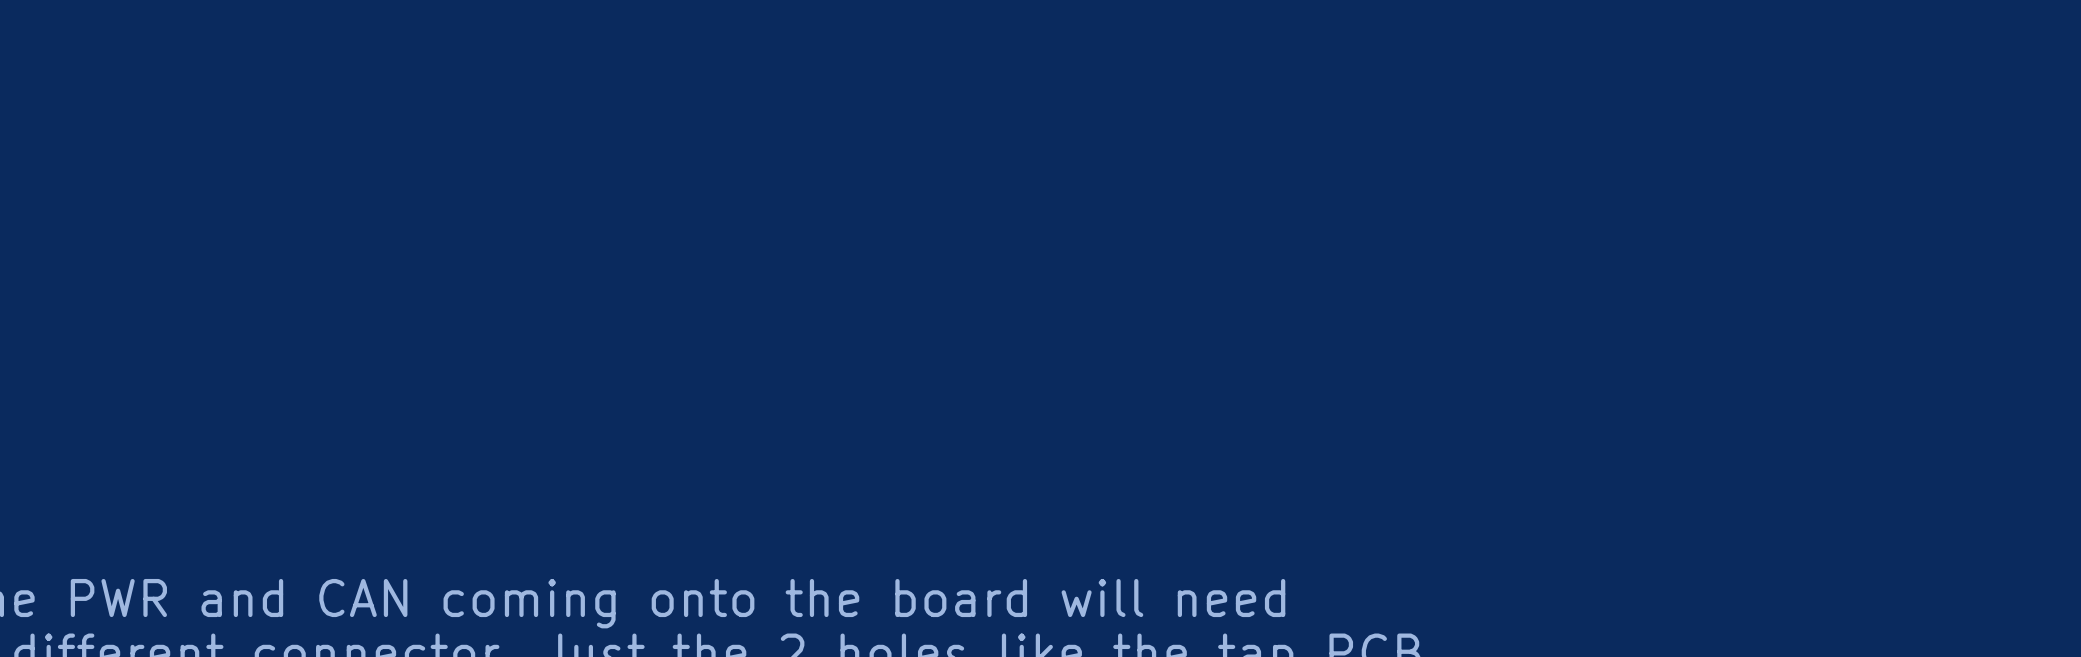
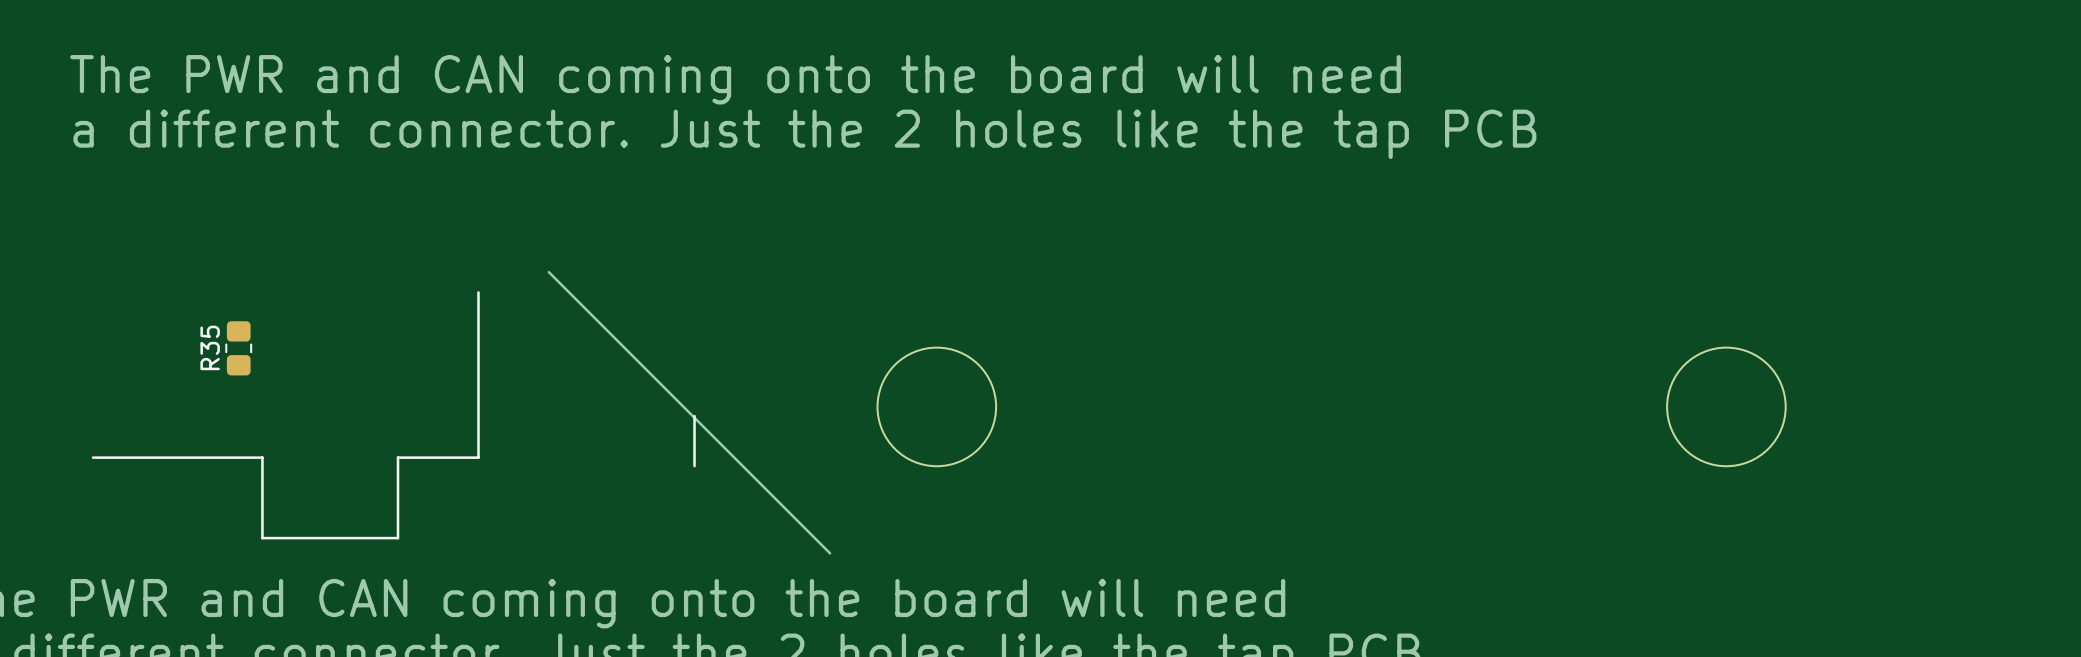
text: none -> The PWR and CAN coming onto the board will need (735, 79)
text: none -> a different connector. Just the 2 holes like the tap PCB (804, 134)
line: none -> (548, 272) (830, 553)
line: none -> (478, 292) (478, 457) (398, 457) (398, 538) (262, 538) (262, 457) (93, 457)
round board edge: none -> [877, 347, 997, 467]
round board edge: none -> [1666, 347, 1787, 467]
R35: none -> (238, 348)
line: none -> (694, 416) (694, 466)

